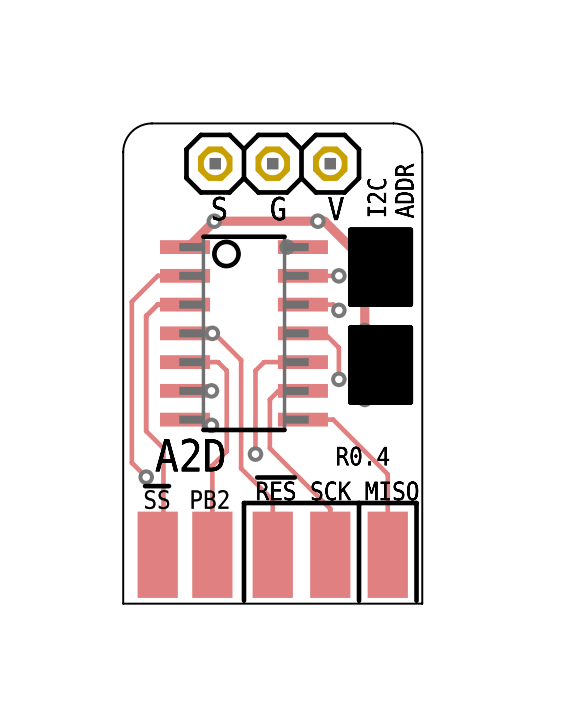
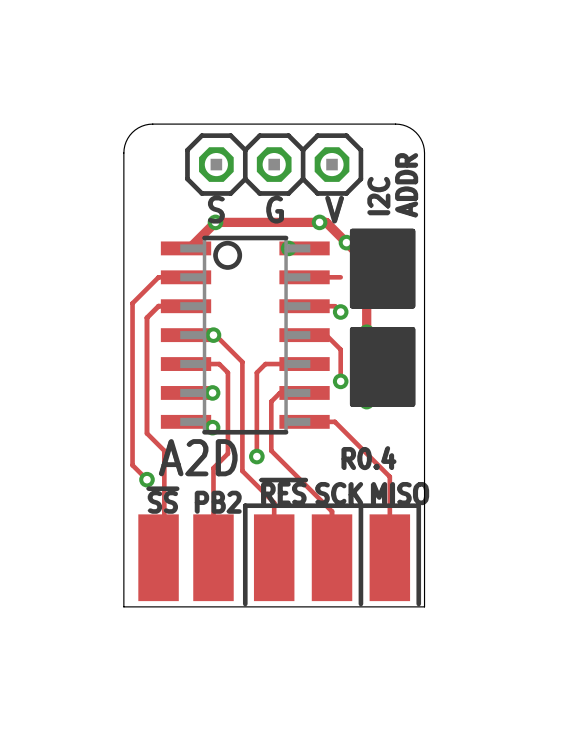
via: none -> (346, 242)
via: (338, 275) -> none

